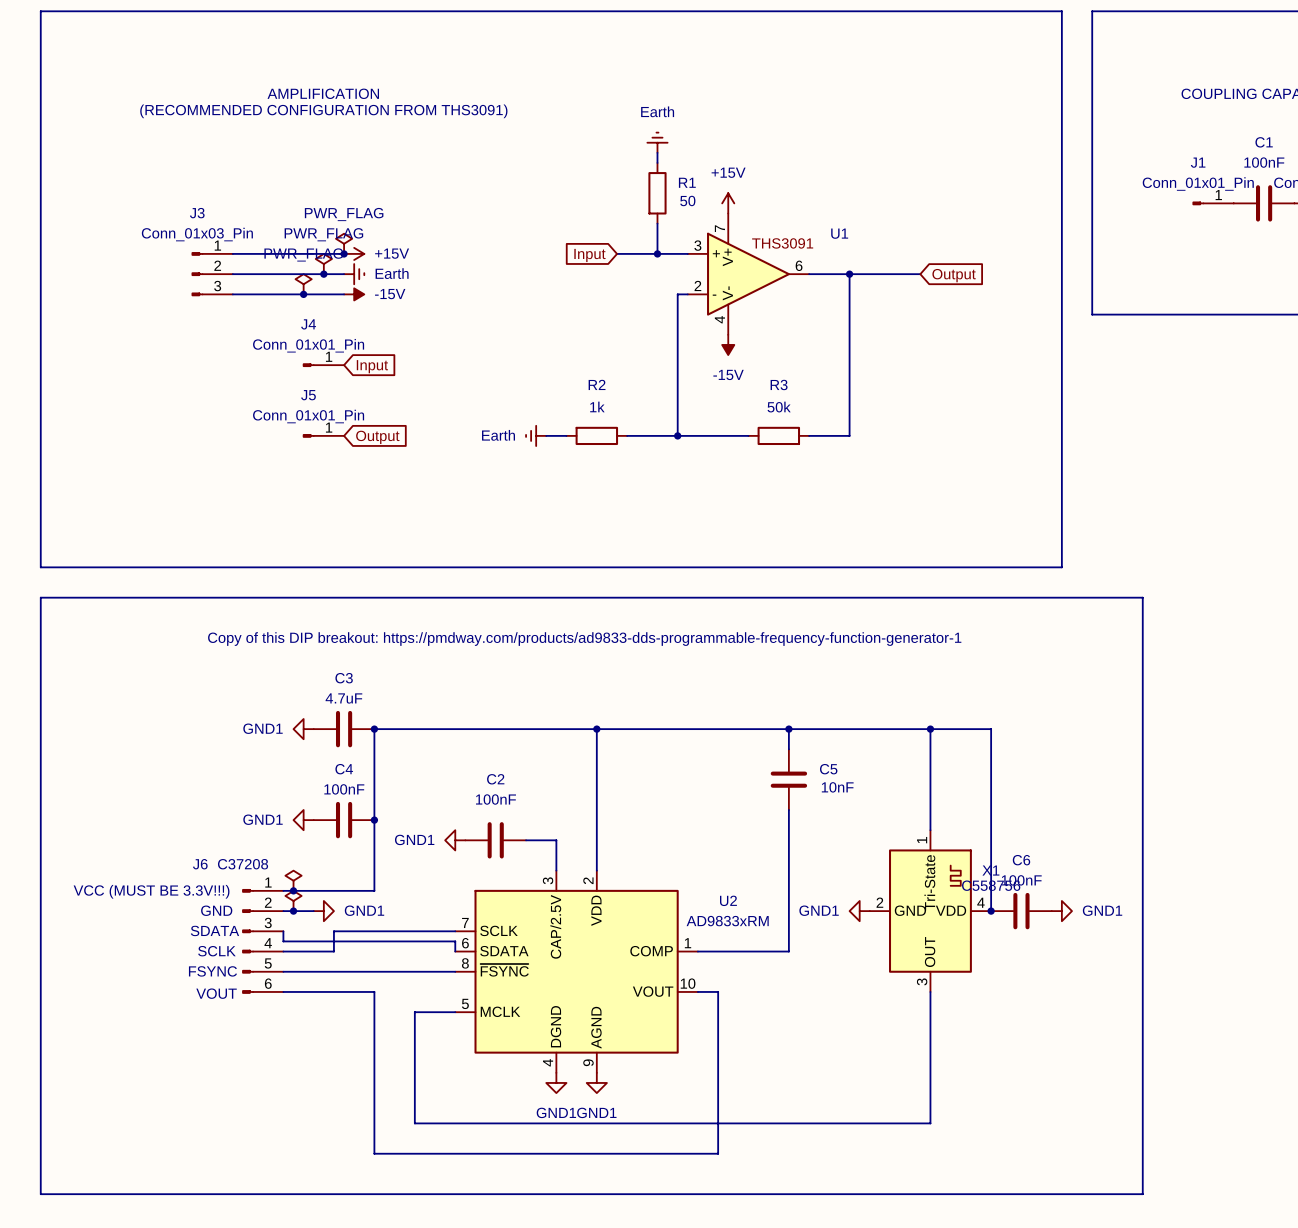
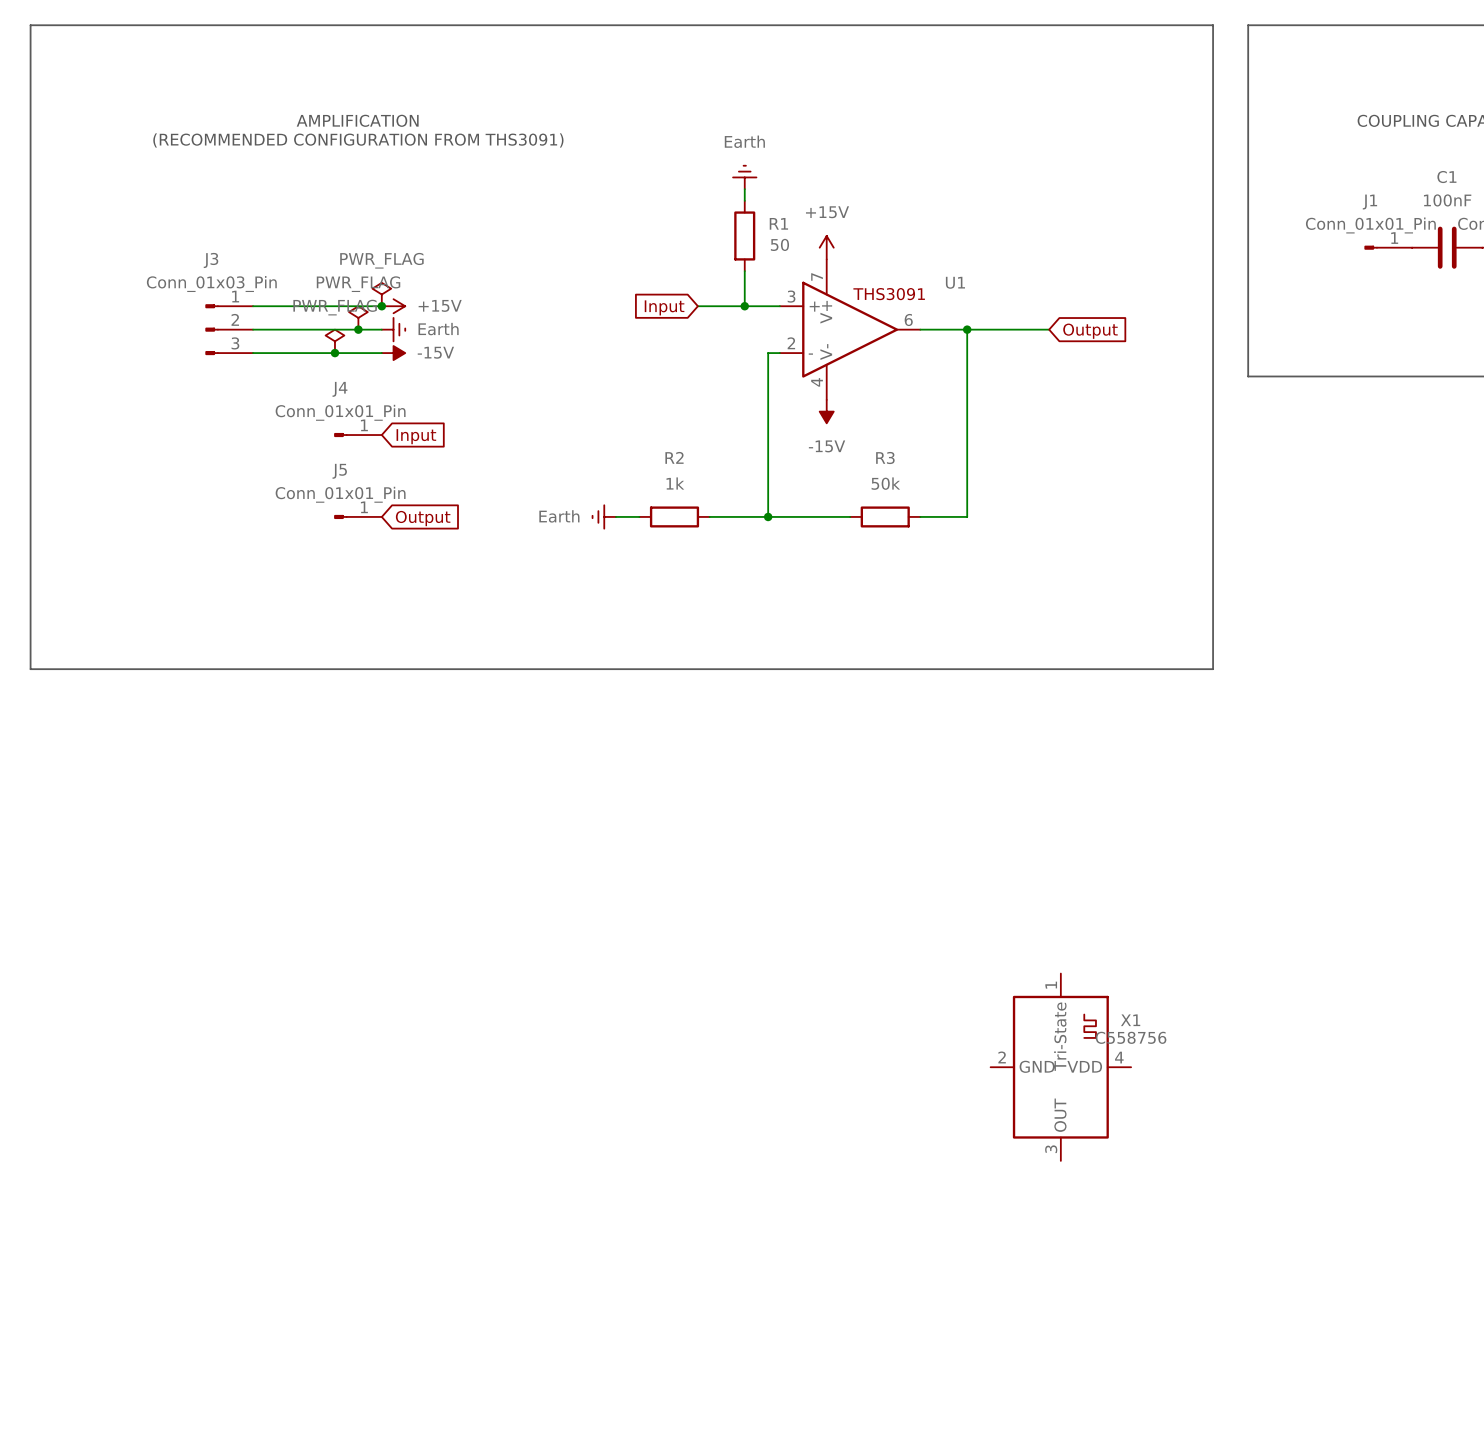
line: (40, 597) (1142, 597) (1142, 1194) (40, 1194) (40, 597) -> none
text: Copy of this DIP breakout: https://pmdway.com/products/ad9833-dds-programmable-frequency-function-generator-1 (584, 639) -> none
power symbol: GND1 (303, 729) -> none
C3: (344, 729) -> none
junction: (374, 729) -> none
wire: (596, 729) (596, 870) -> none
junction: (596, 729) -> none
wire: (788, 729) (788, 749) -> none
junction: (788, 729) -> none
wire: (930, 729) (930, 830) -> none
junction: (930, 729) -> none
C5: (788, 779) -> none
wire: (788, 809) (788, 951) (697, 951) -> none
power symbol: GND1 (303, 820) -> none
C4: (344, 820) -> none
junction: (374, 820) -> none
power symbol: GND1 (455, 840) -> none
C2: (495, 840) -> none
wire: (526, 840) (556, 840) (556, 870) -> none
power symbol: (293, 880) -> none
wire: (283, 890) (374, 890) (374, 729) (991, 729) (991, 911) -> none
junction: (293, 890) -> none
text: VCC (MUST BE 3.3V!!!) (151, 891) -> none
power symbol: (293, 900) -> none
text: GND (216, 910) -> none
wire: (283, 911) (313, 911) -> none
junction: (293, 911) -> none
power symbol: GND1 (323, 911) -> none
power symbol: GND1 (859, 911) -> none
junction: (991, 911) -> none
C6: (1021, 911) -> none
power symbol: GND1 (1061, 911) -> none
text: SDATA (214, 930) -> none
wire: (283, 931) (283, 941) (455, 941) (455, 951) -> none
wire: (455, 931) (333, 931) (333, 951) (283, 951) -> none
J6: C37208 (262, 941) -> none
text: SCLK (216, 951) -> none
text: FSYNC (212, 971) -> none
wire: (283, 971) (455, 971) -> none
U2: AD9833xRM (576, 971) -> none
wire: (283, 991) (374, 991) (374, 1153) (718, 1153) (718, 991) (697, 991) -> none
wire: (930, 991) (930, 1123) (414, 1123) (414, 1012) (455, 1012) -> none
text: VOUT (216, 993) -> none
power symbol: GND1 (556, 1082) -> none
power symbol: GND1 (596, 1082) -> none

